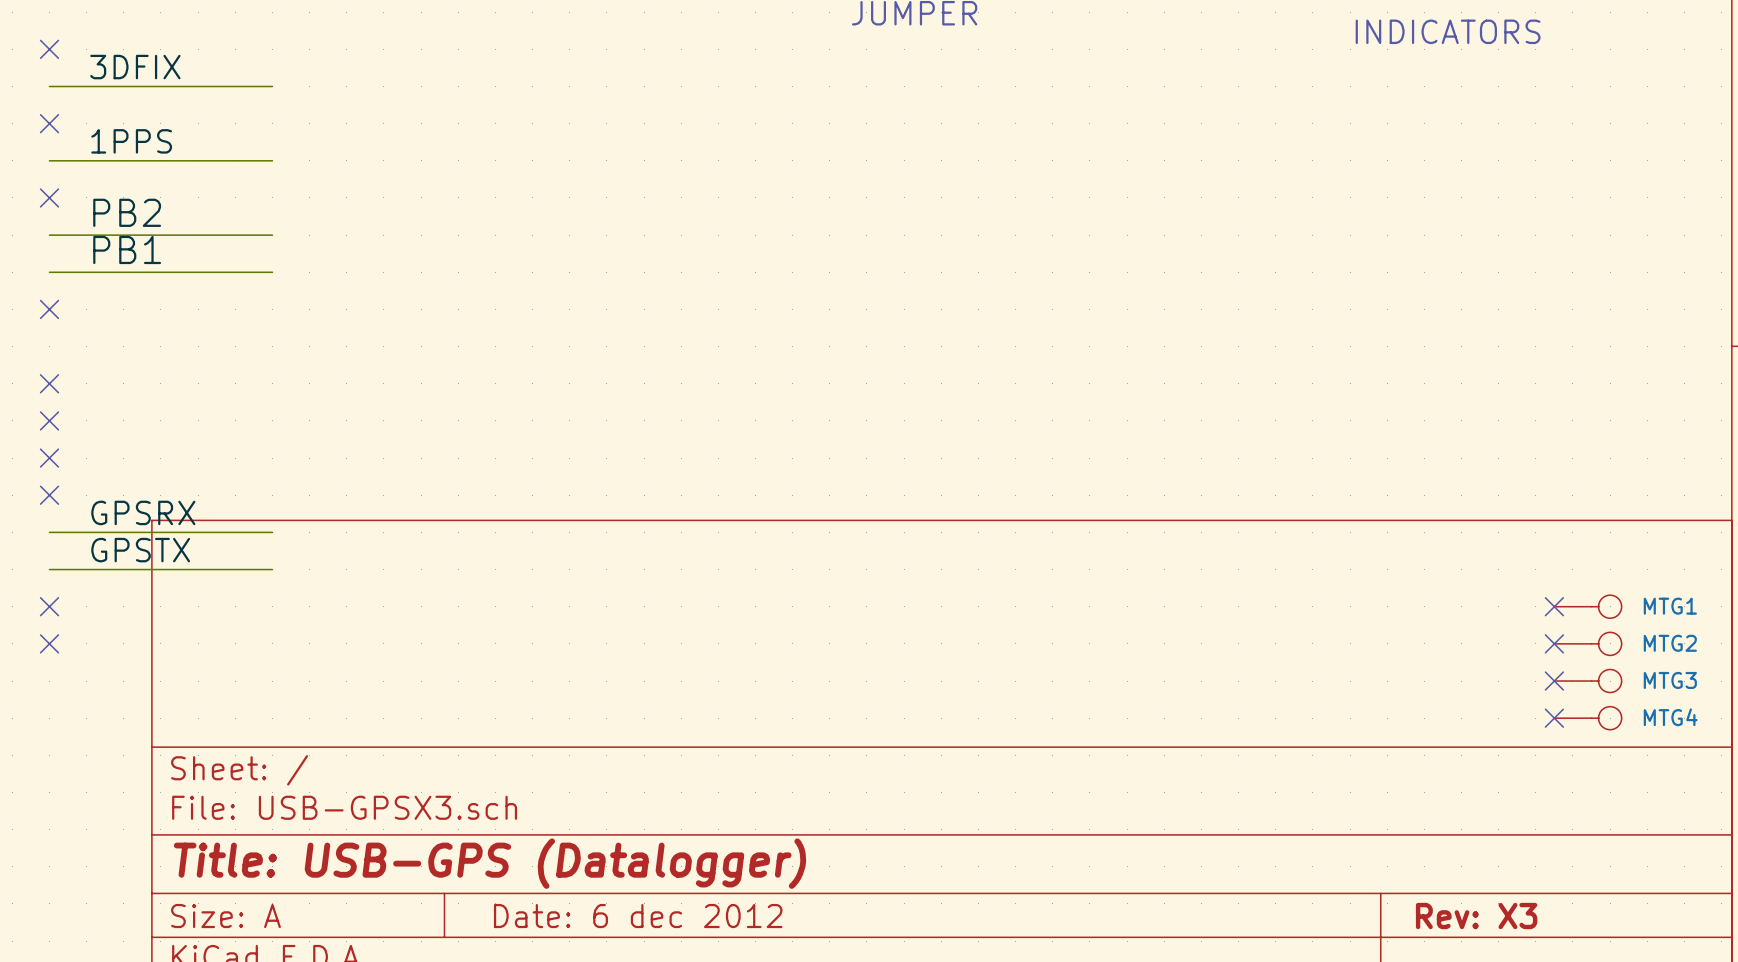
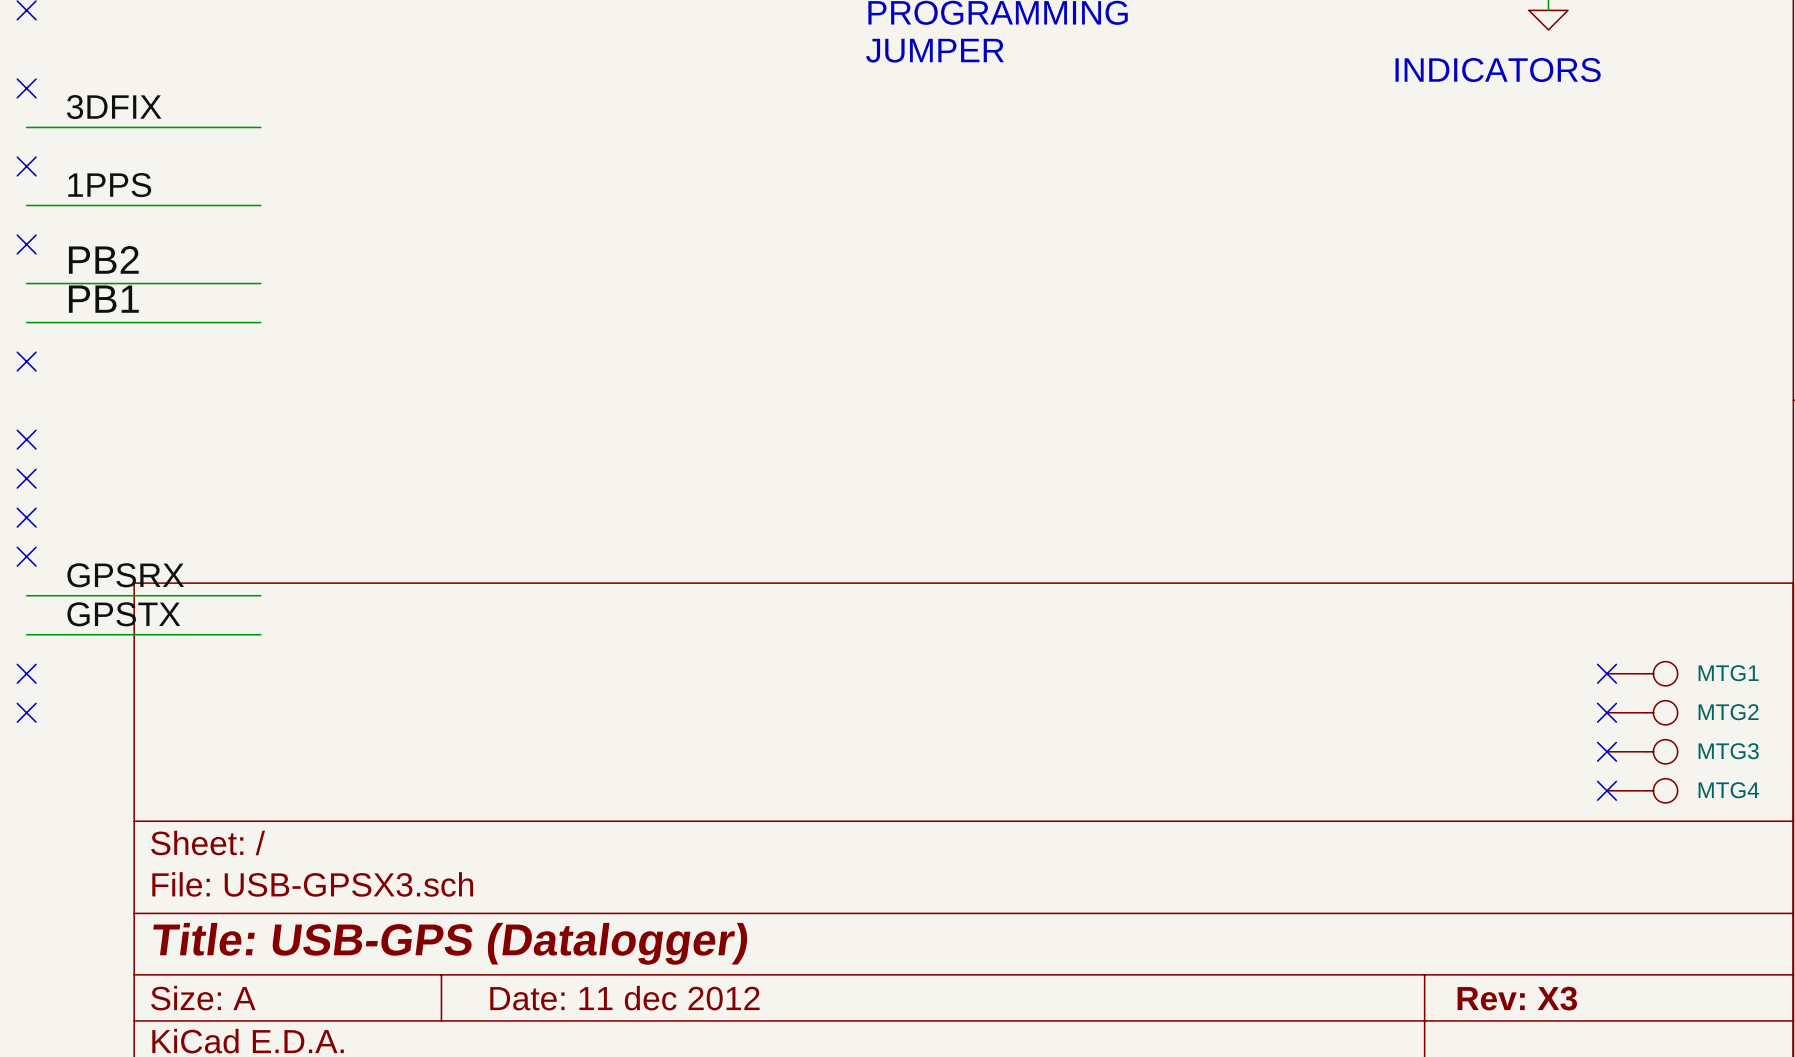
title block: Date: 6 dec 2012 (638, 916) -> Date: 11 dec 2012 (624, 998)

